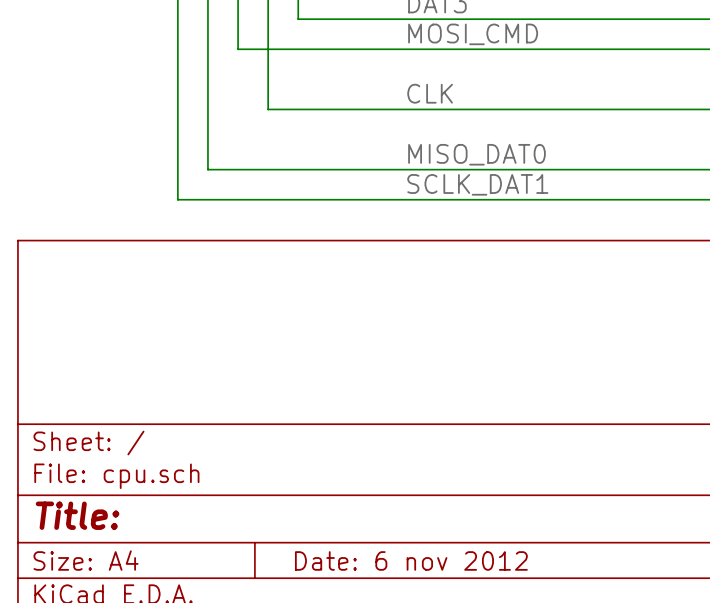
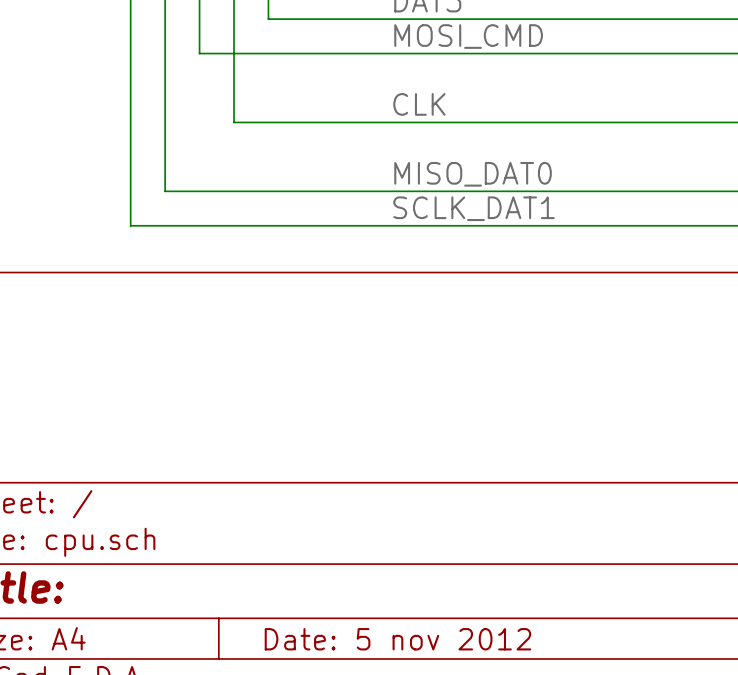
title block: Date: 6 nov 2012 (411, 560) -> Date: 5 nov 2012 (397, 639)

